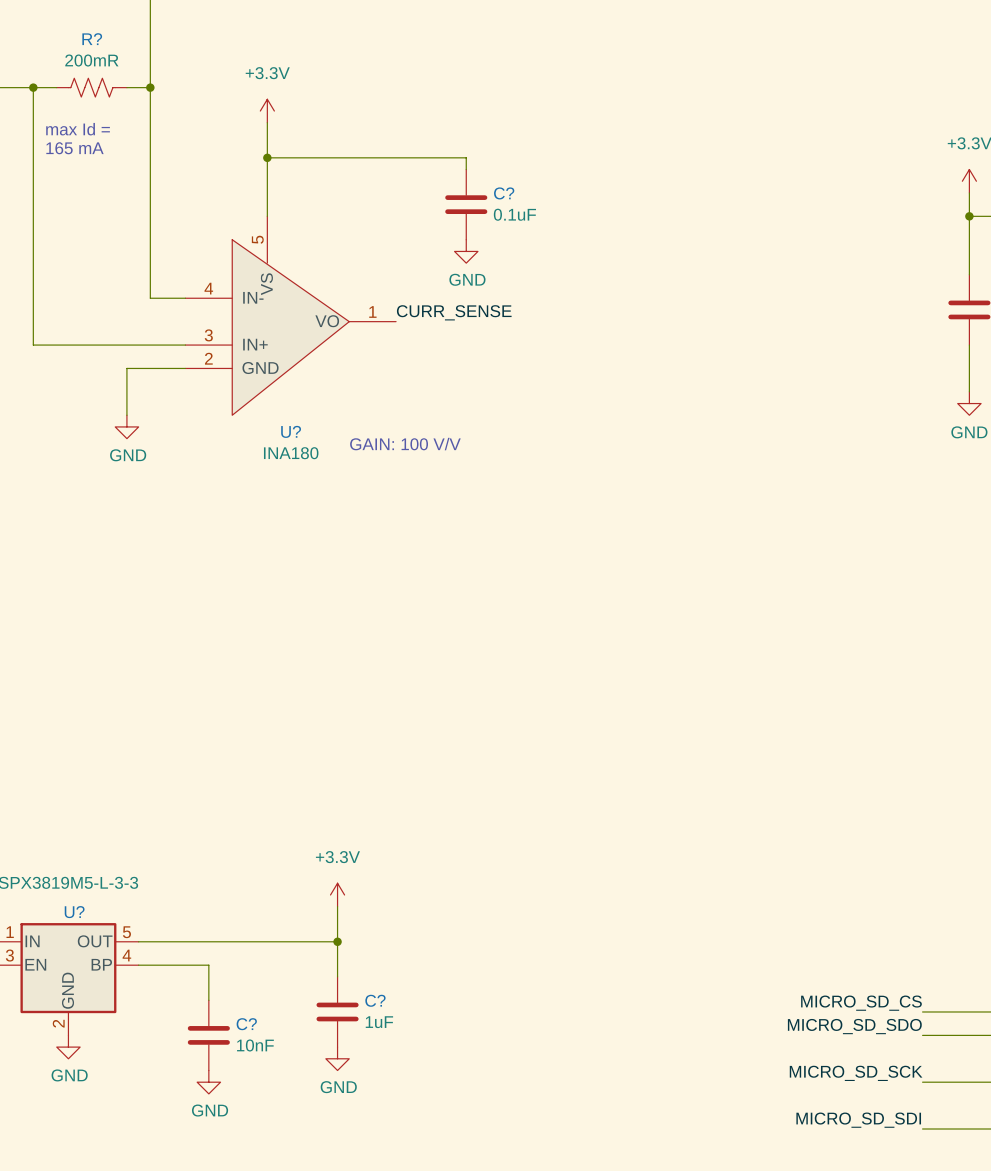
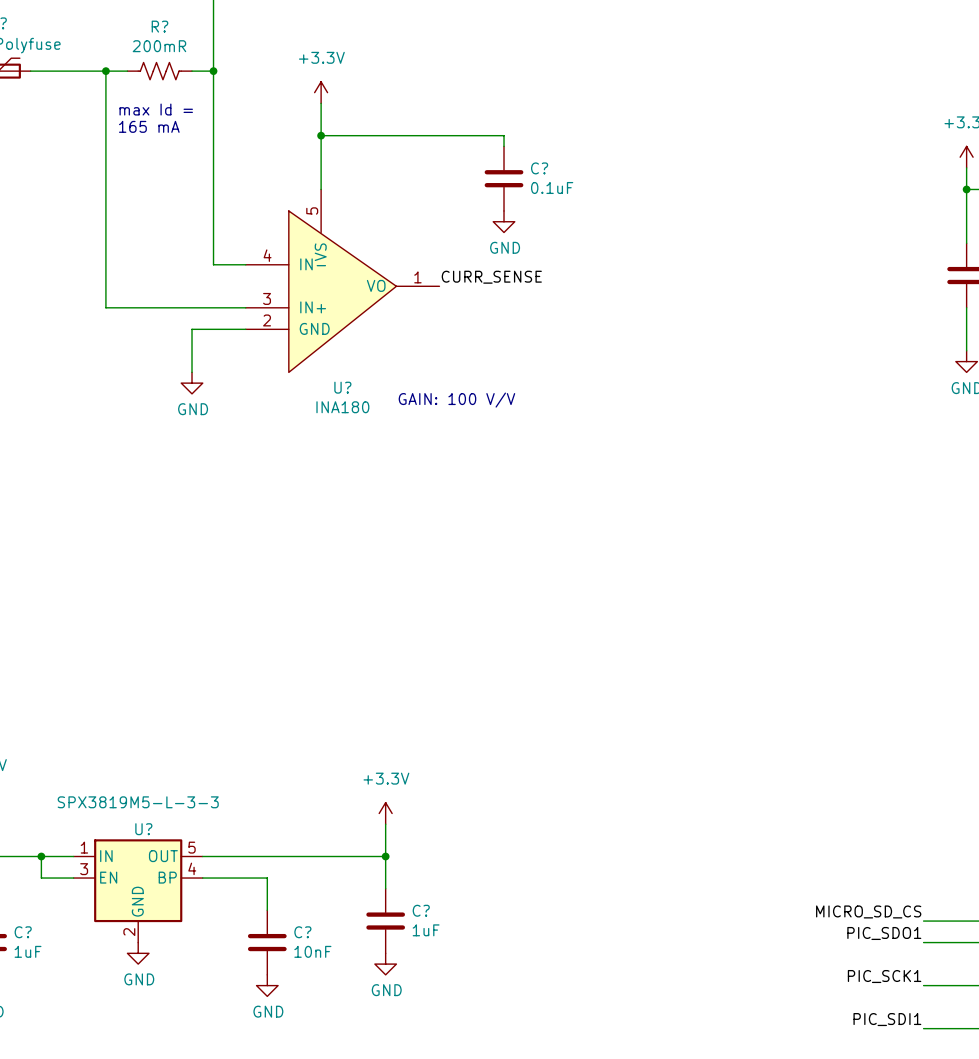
label: MICRO_SD_SDO (854, 1026) -> PIC_SDO1 (884, 933)
label: MICRO_SD_SCK (856, 1073) -> PIC_SCK1 (884, 976)
label: MICRO_SD_SDI (858, 1120) -> PIC_SDI1 (887, 1019)

